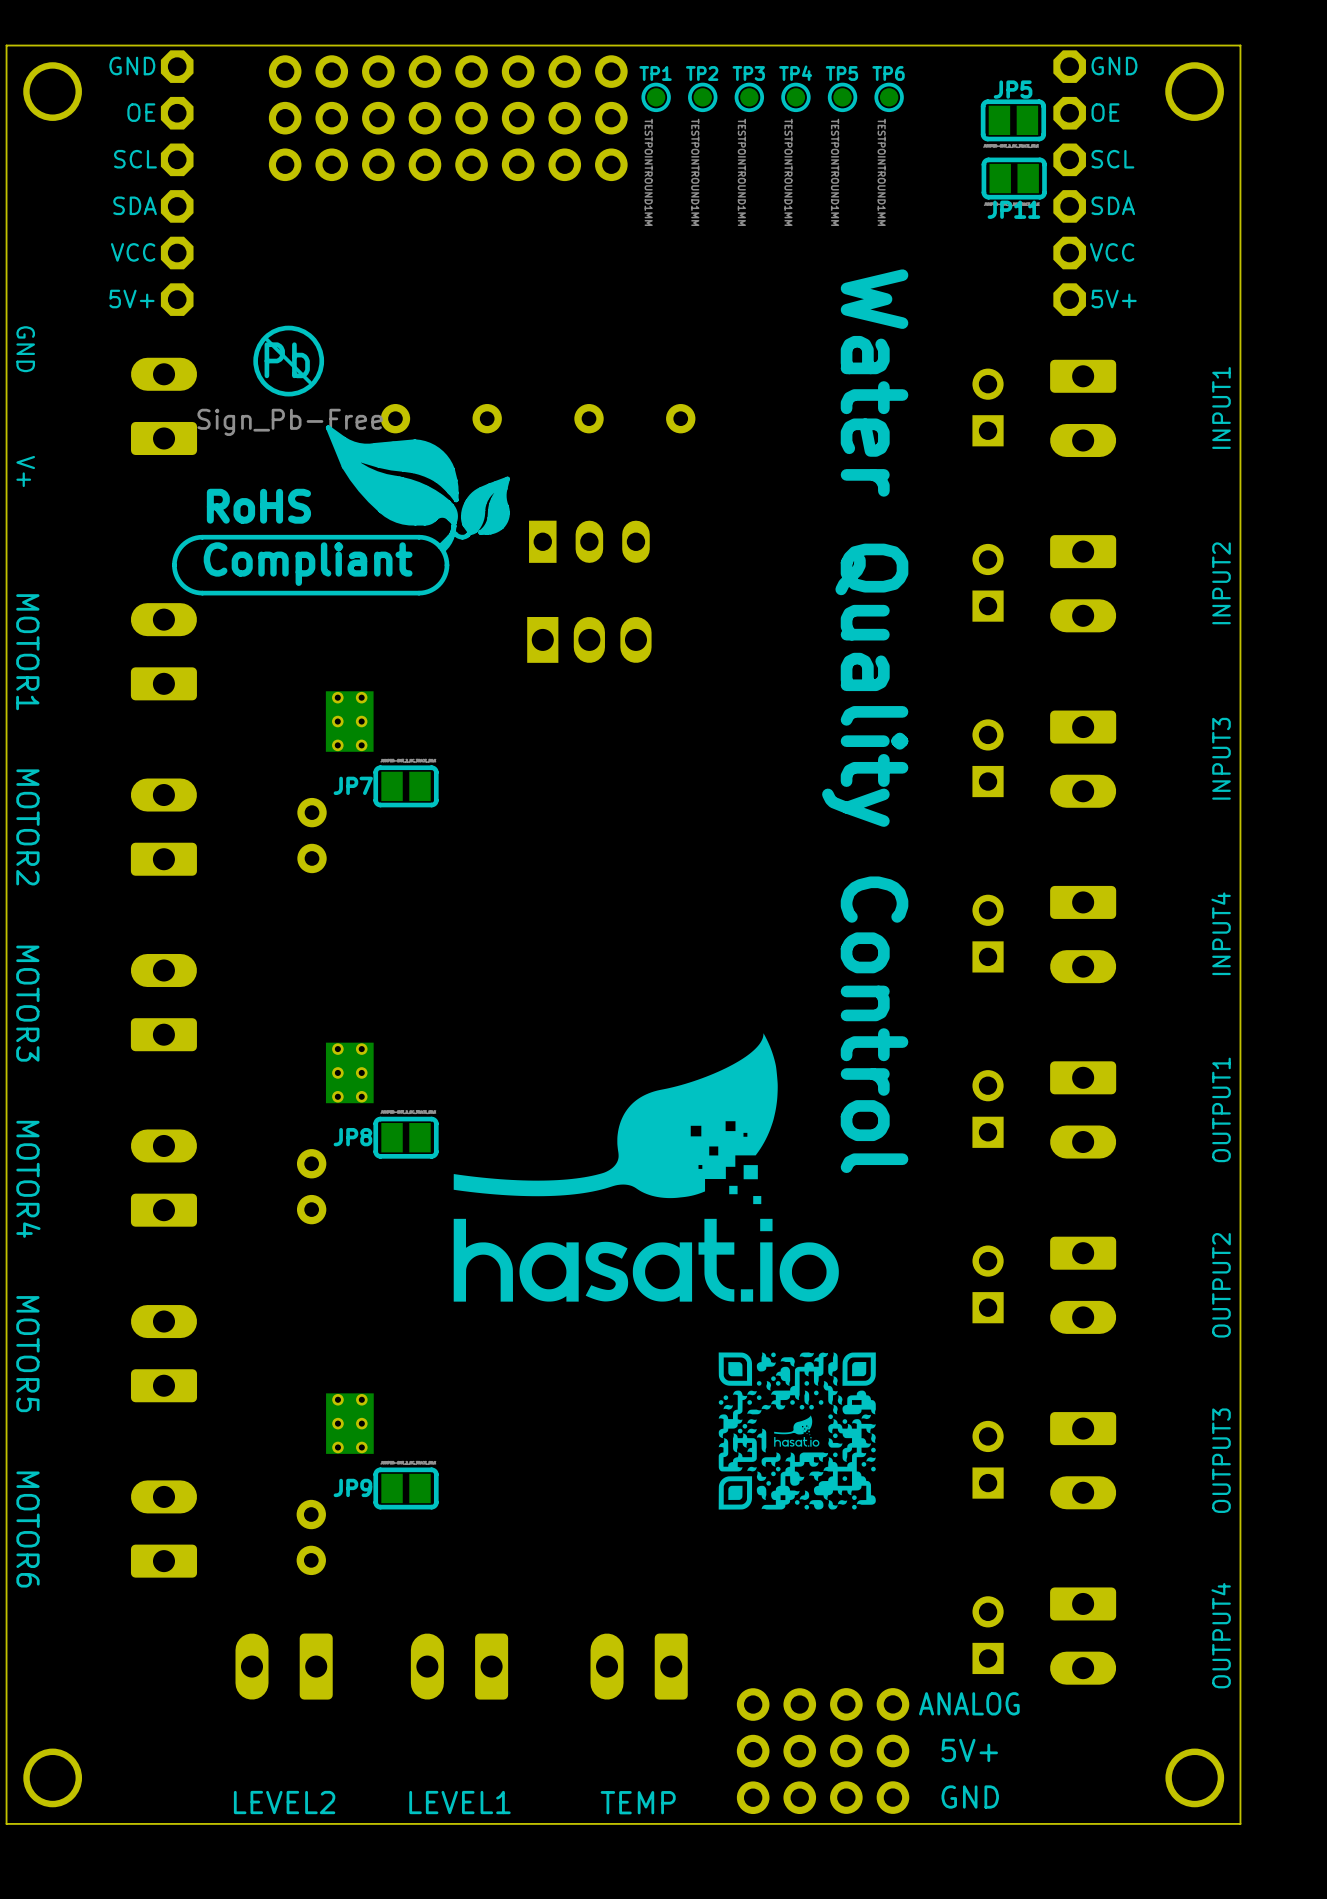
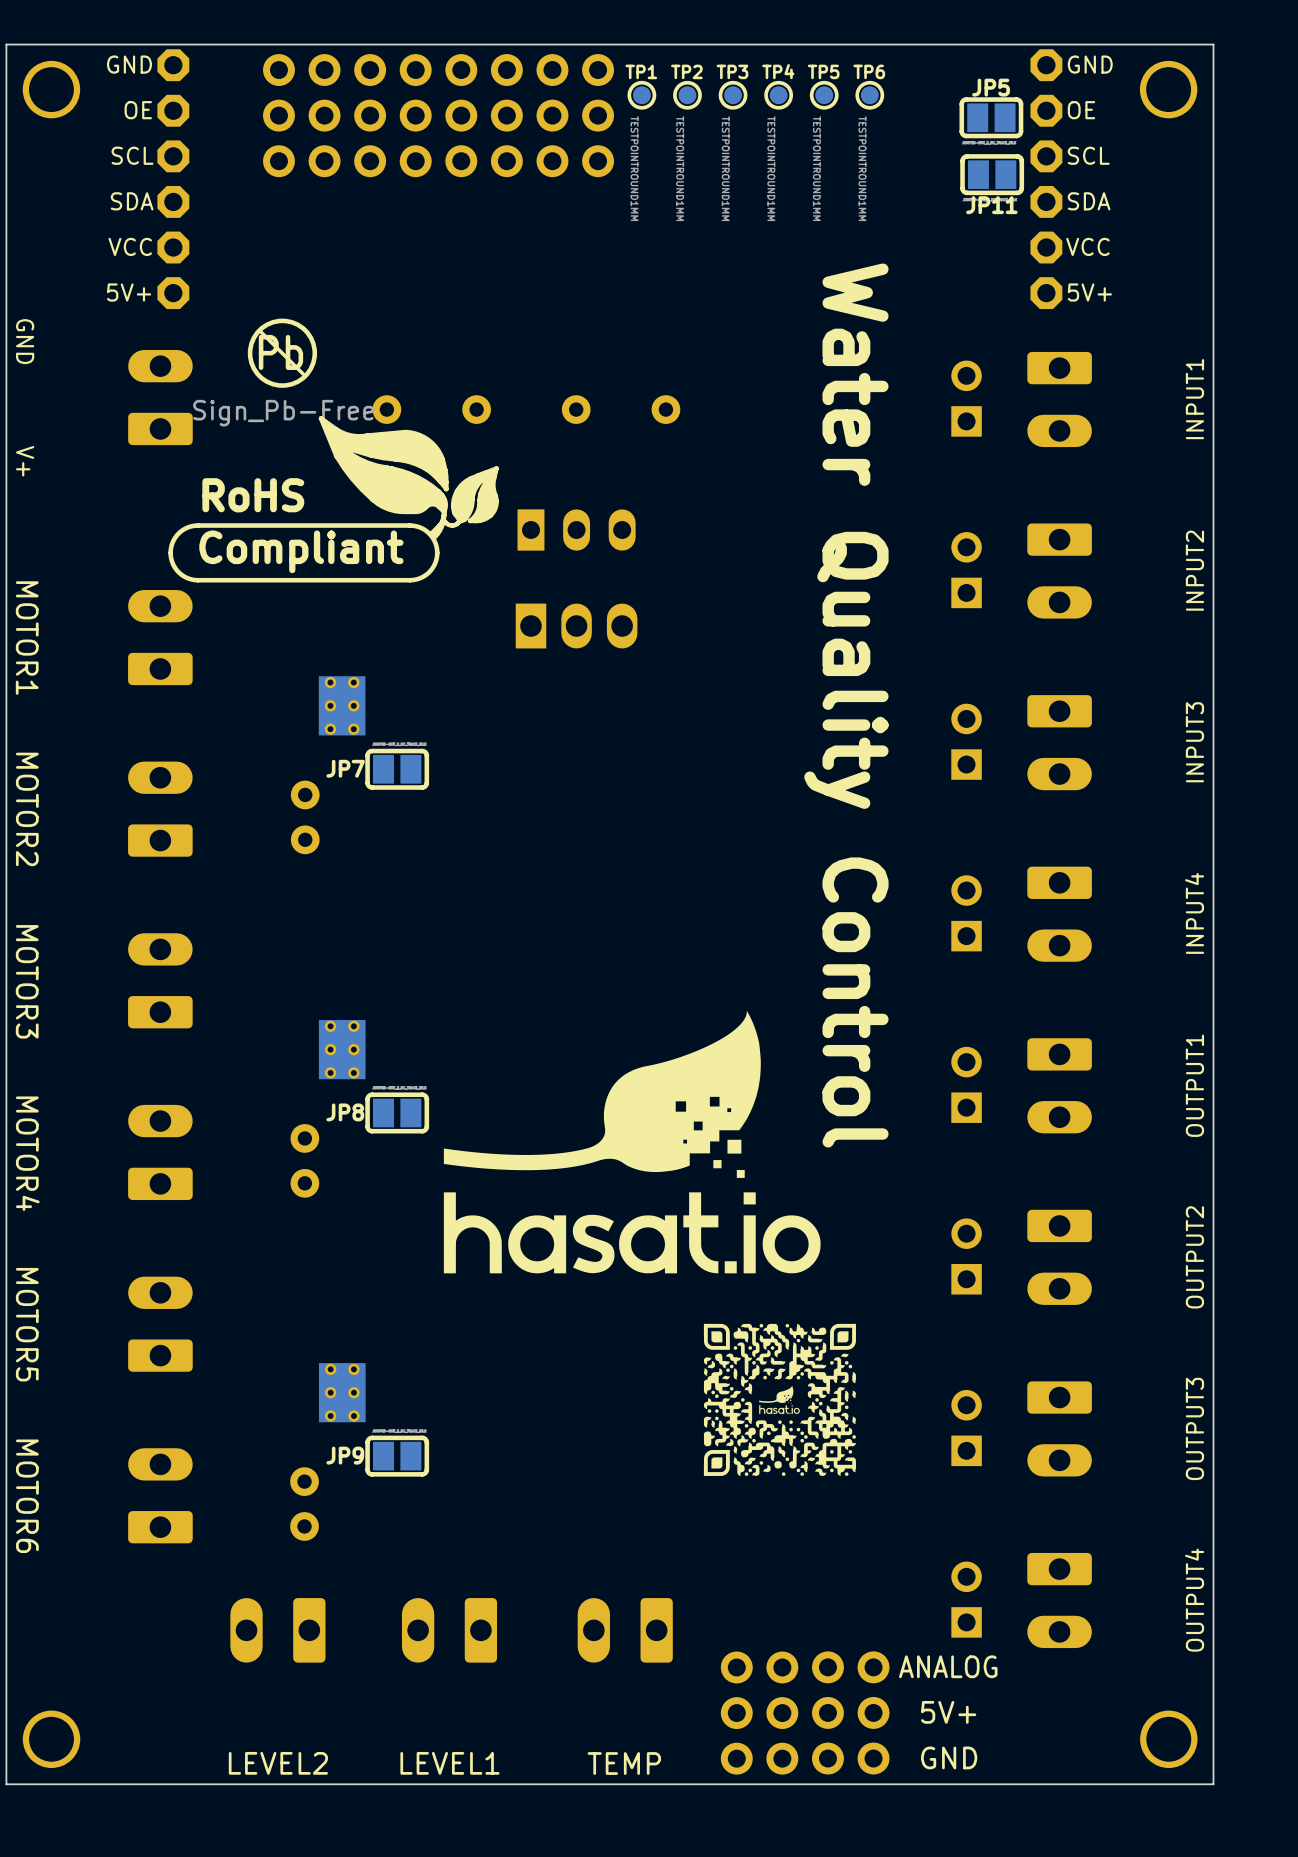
drawing shape: [718, 1352, 876, 1510] -> [703, 1323, 856, 1476]

